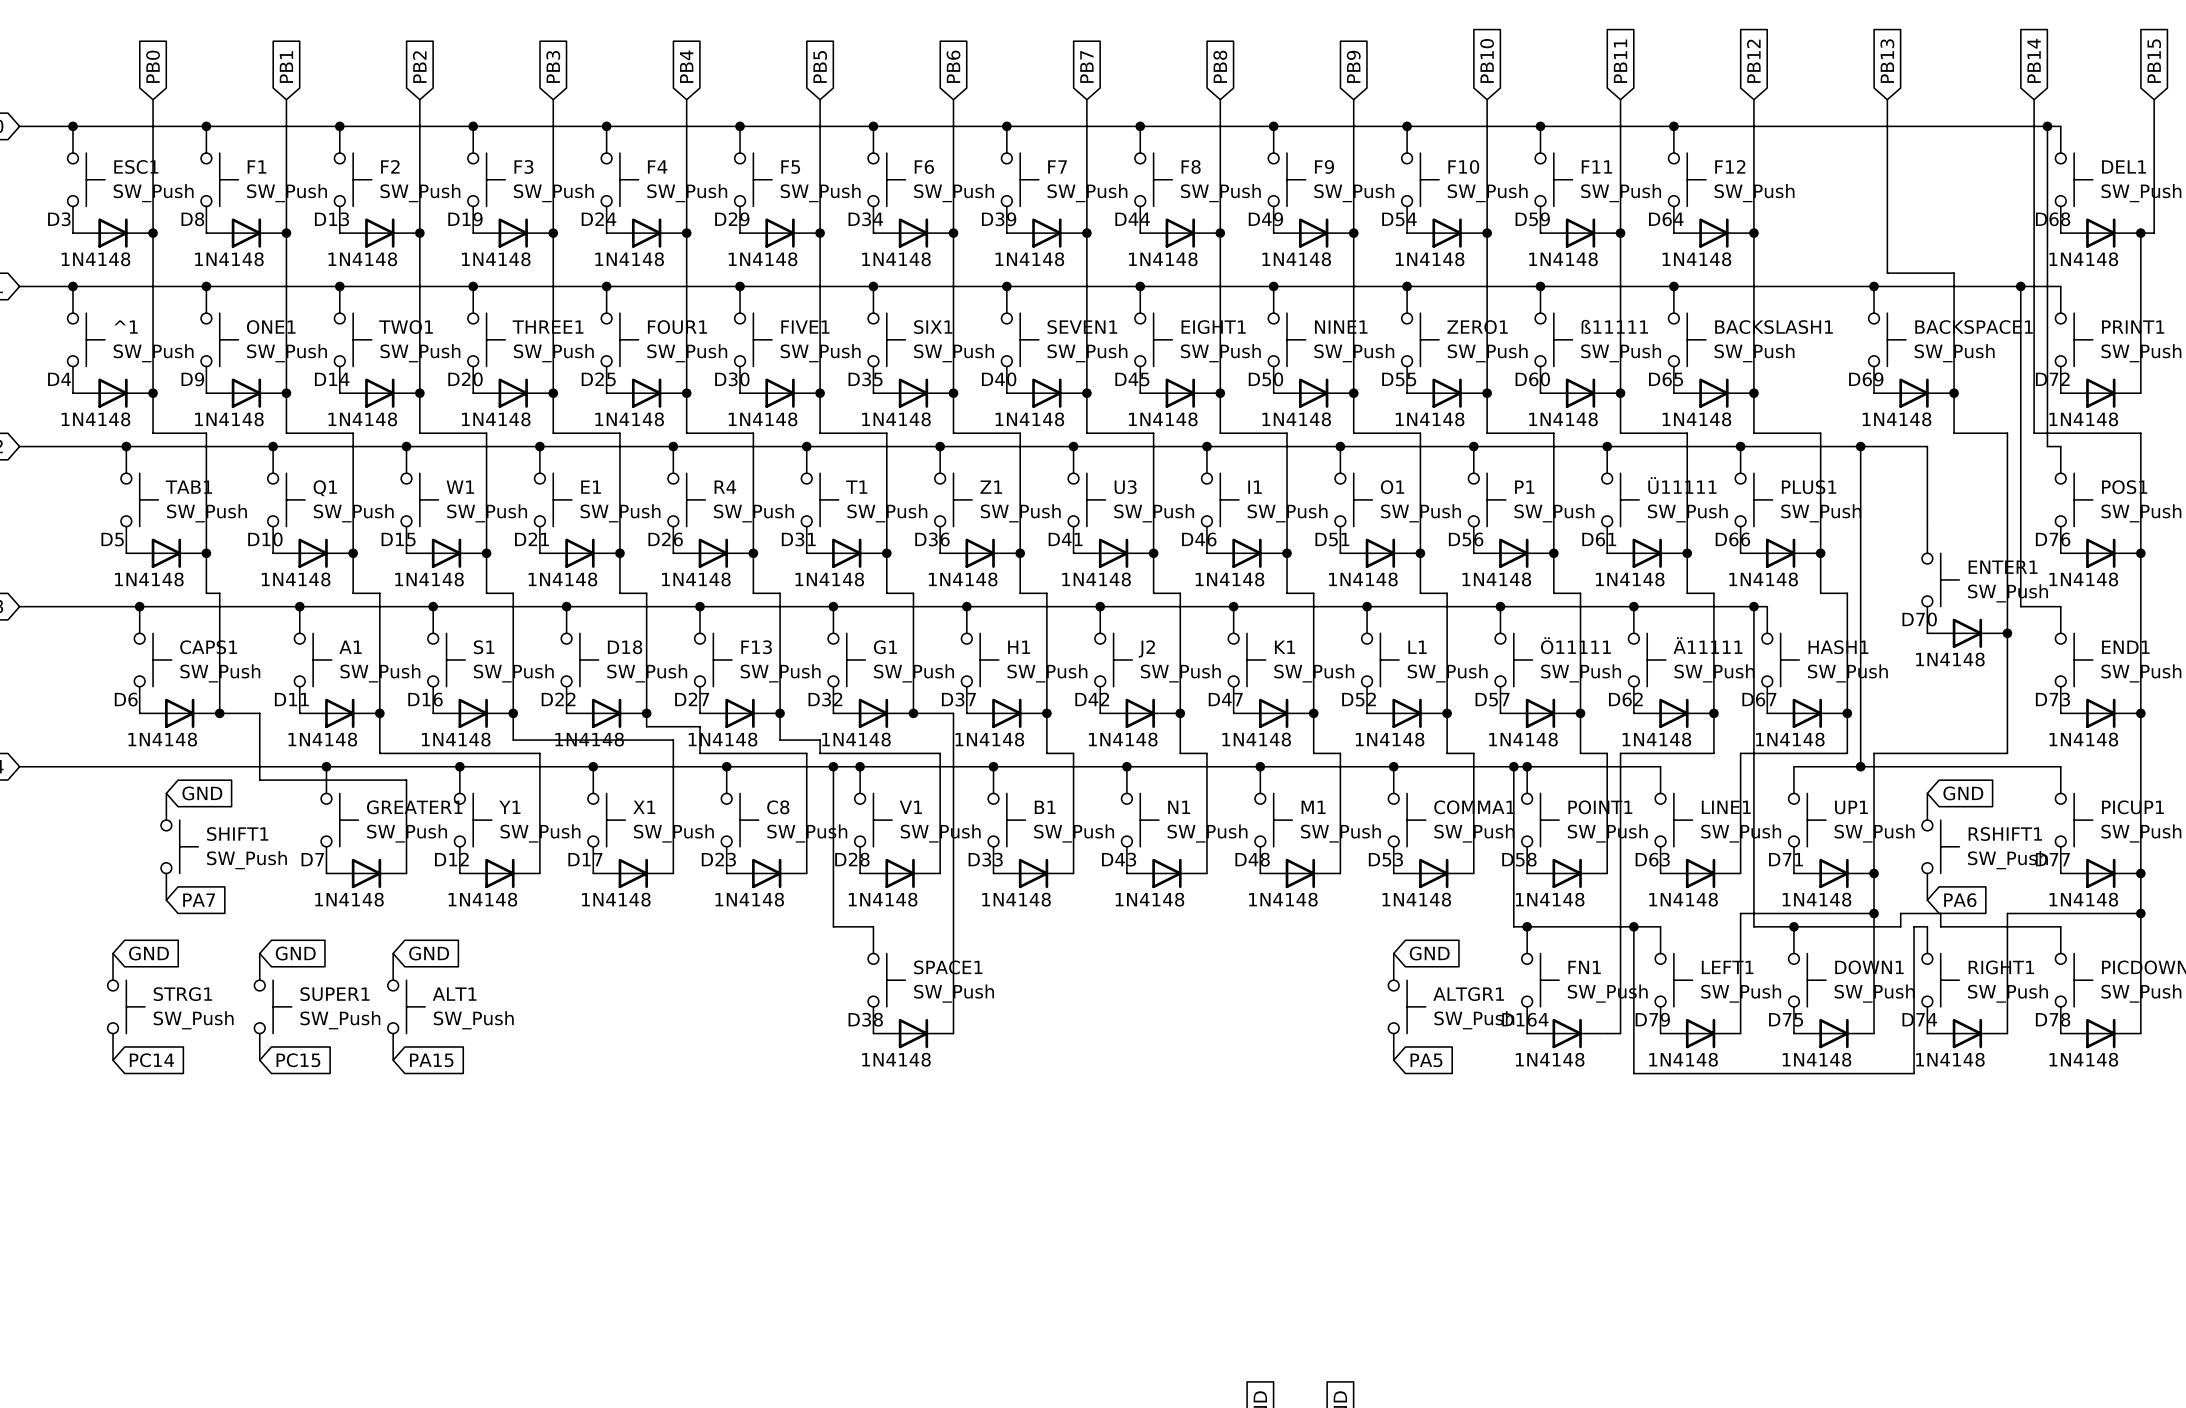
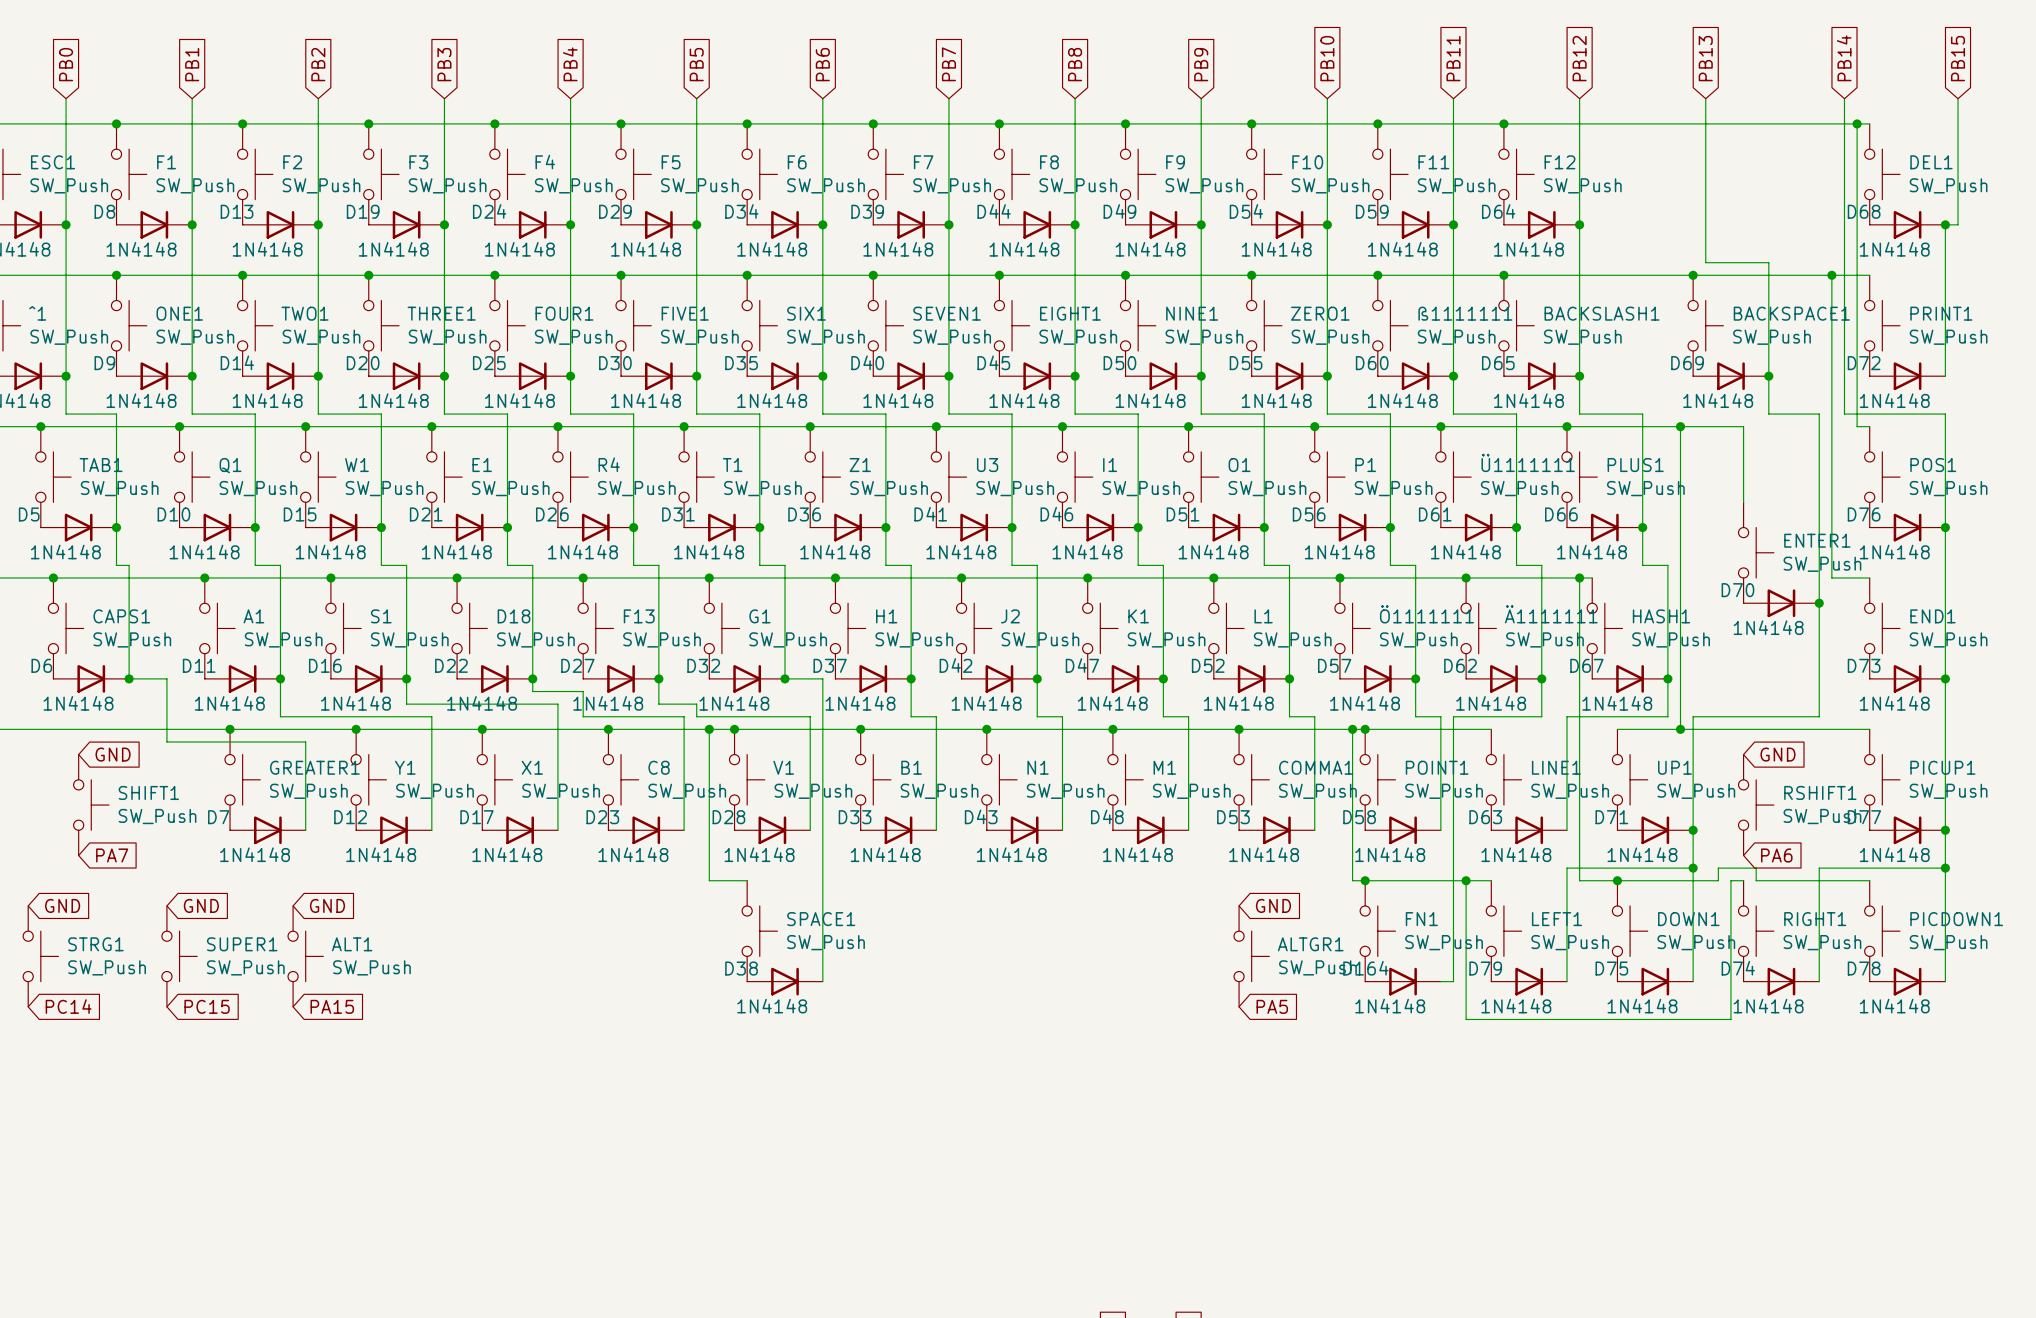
ß11111 name: ß11111 (1614, 326) -> ß1111111 (1465, 313)
Ü11111 name: Ü11111 (1682, 485) -> Ü1111111 (1528, 462)
Ö11111 name: Ö11111 (1575, 645) -> Ö1111111 (1426, 614)
Ä11111 name: Ä11111 (1707, 645) -> Ä1111111 (1551, 614)

